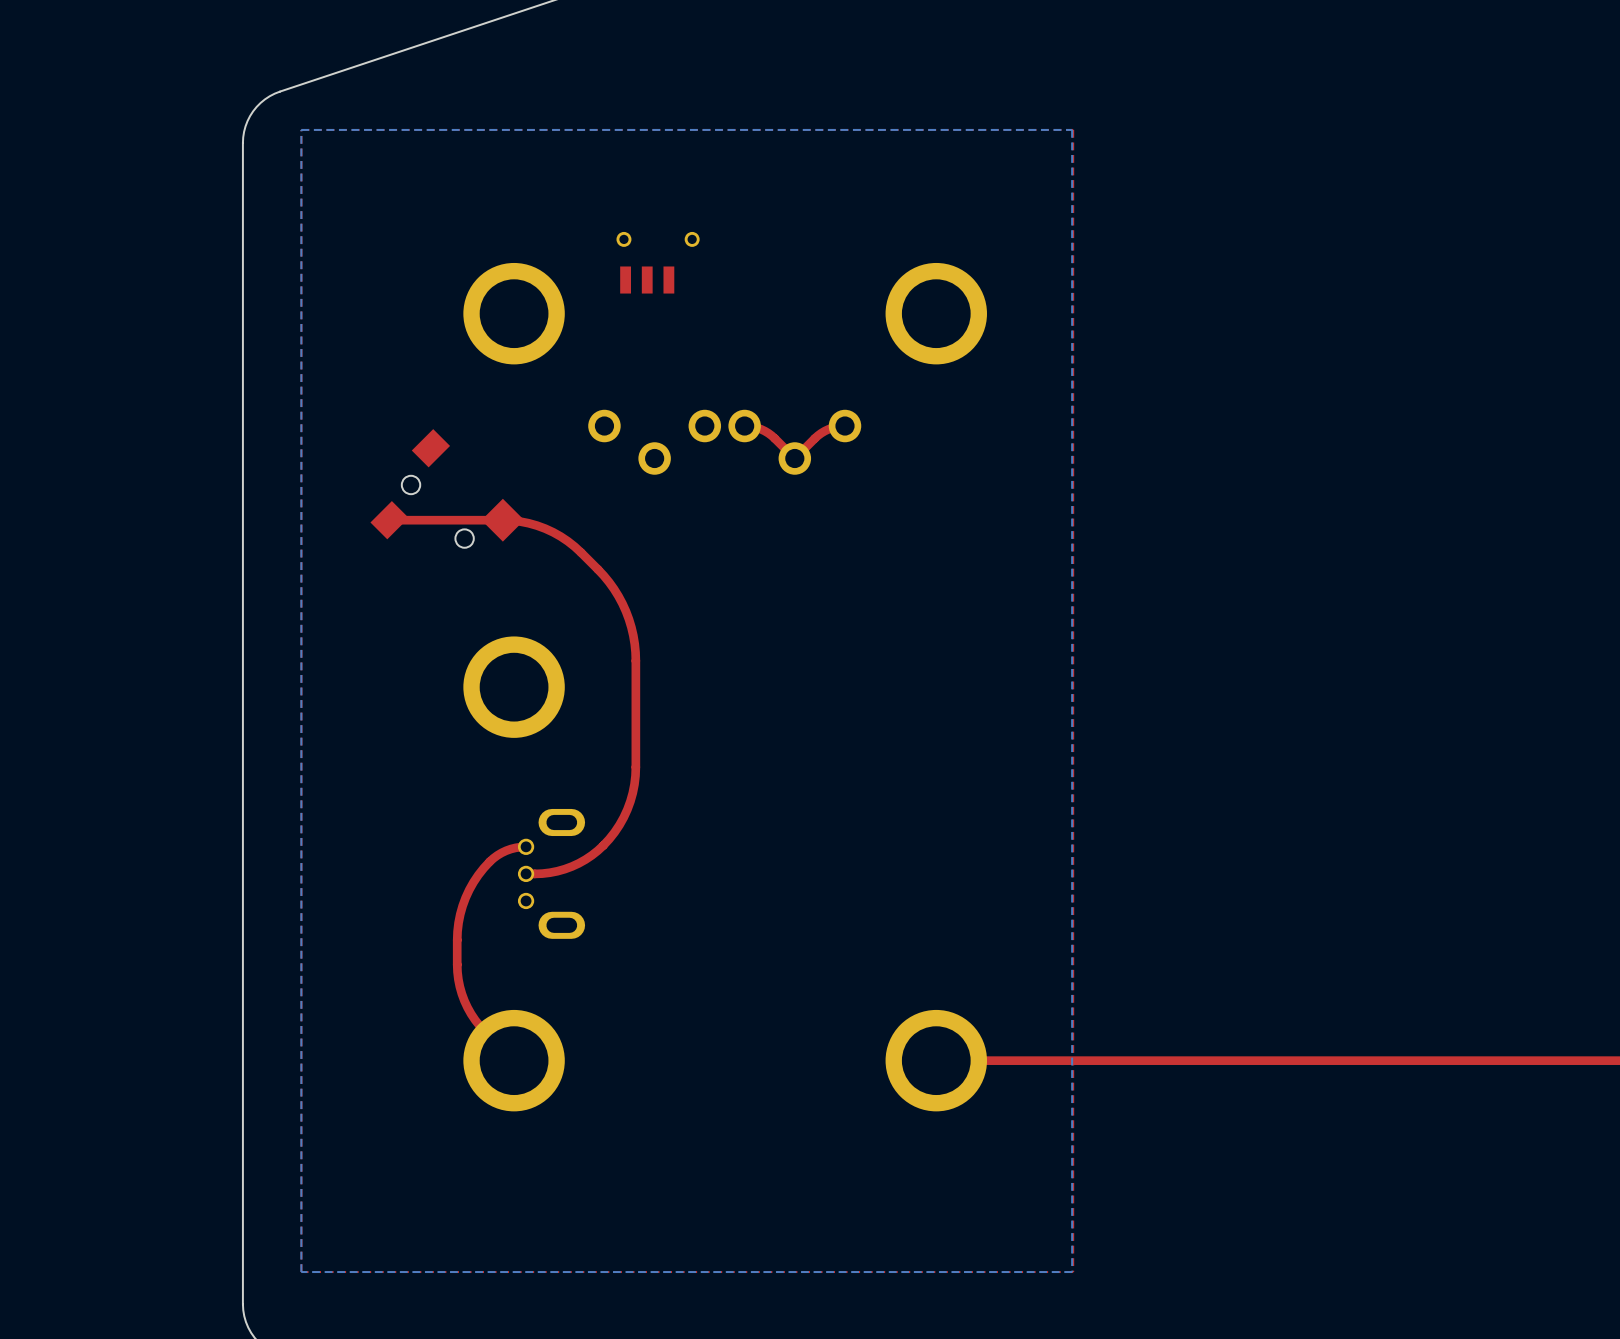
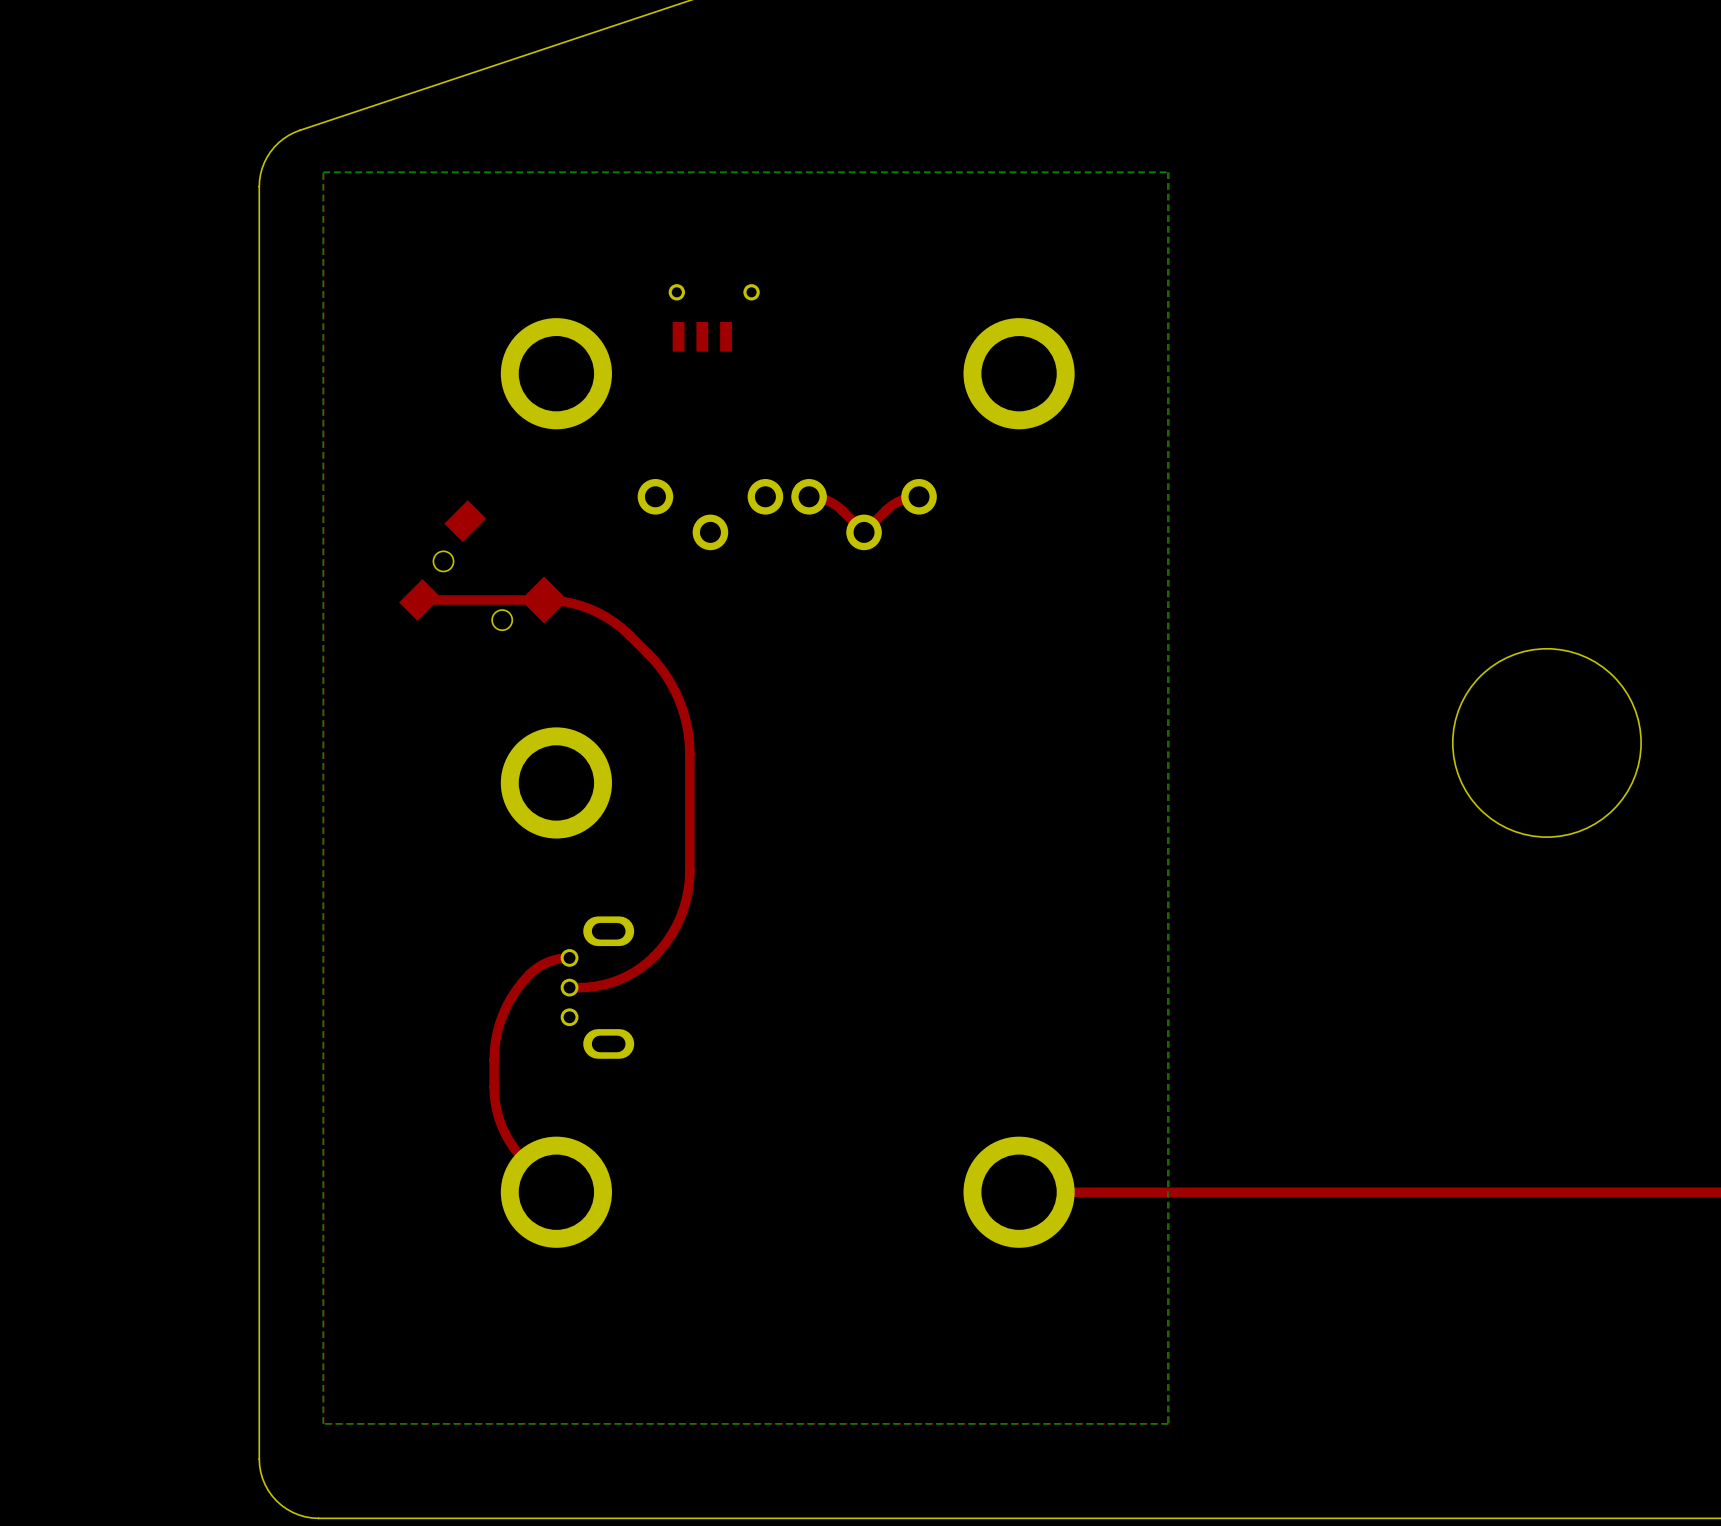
round board edge: none -> [1452, 648, 1642, 838]

